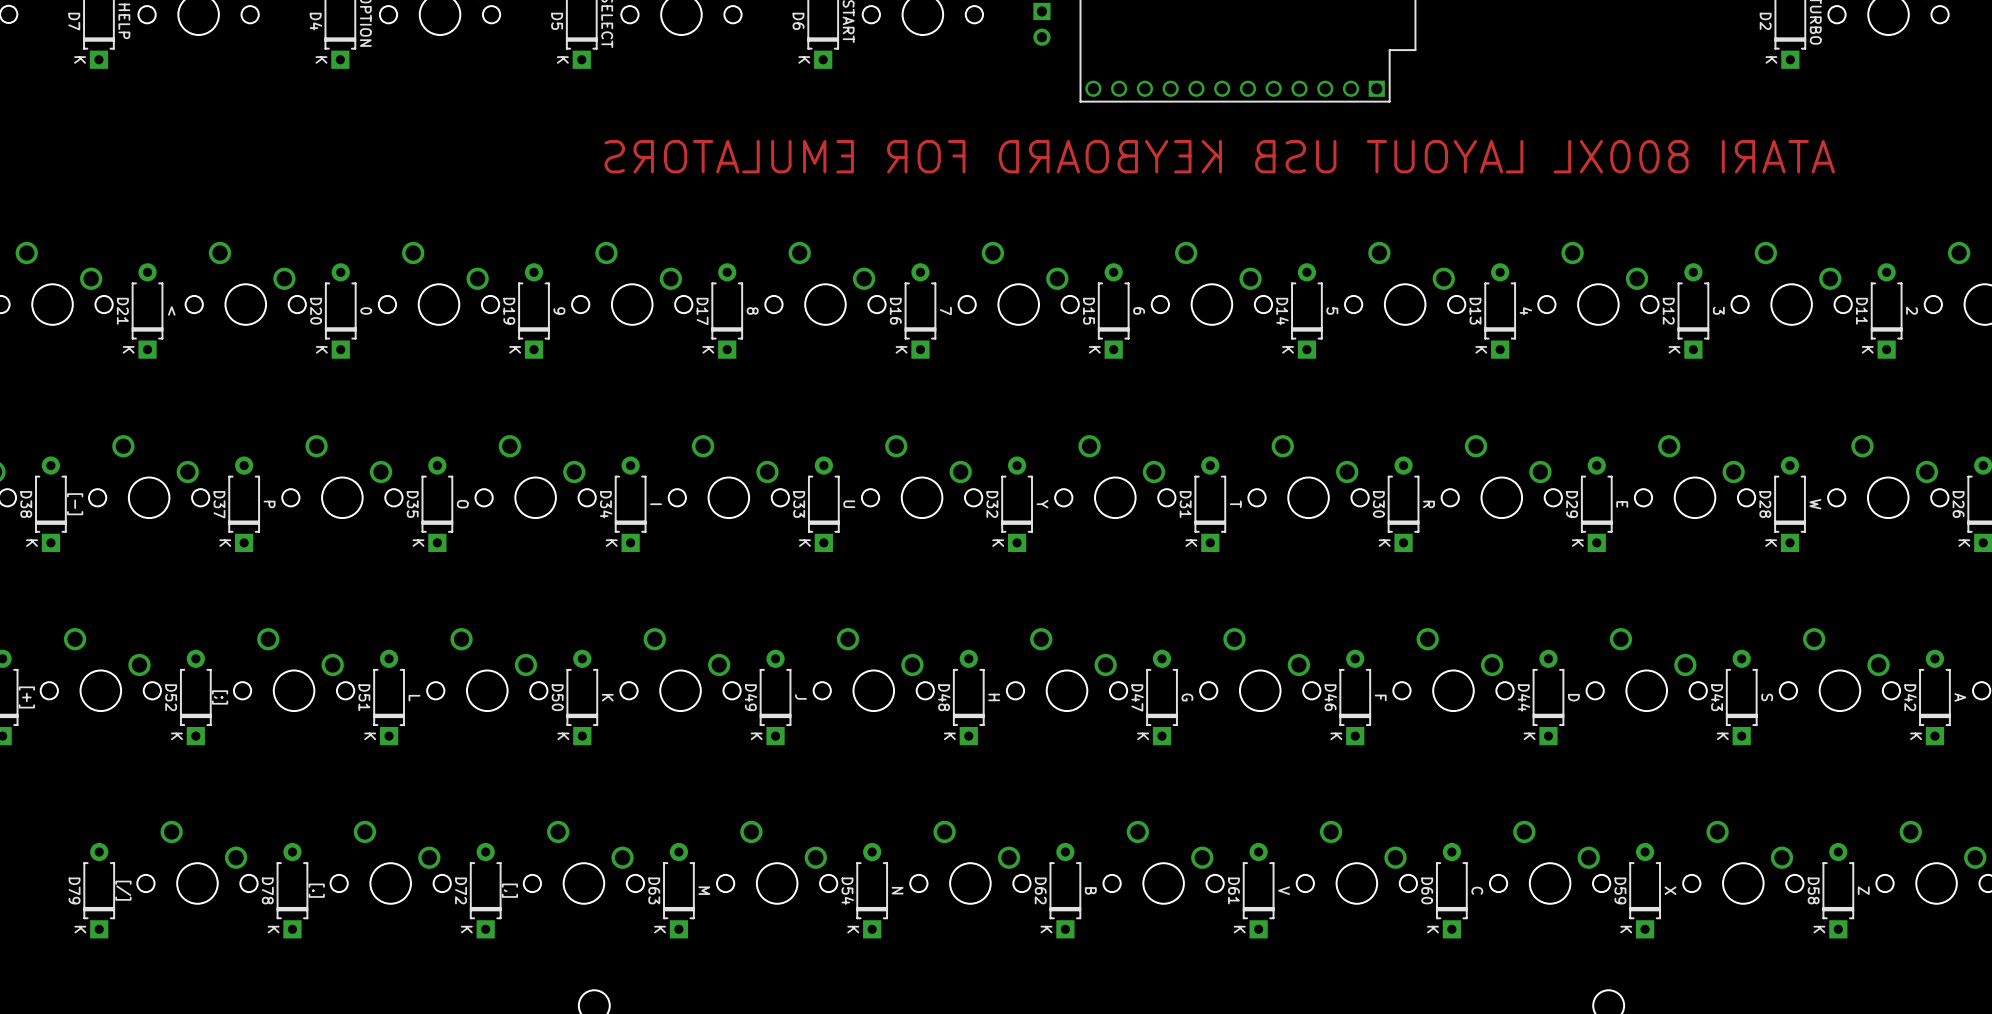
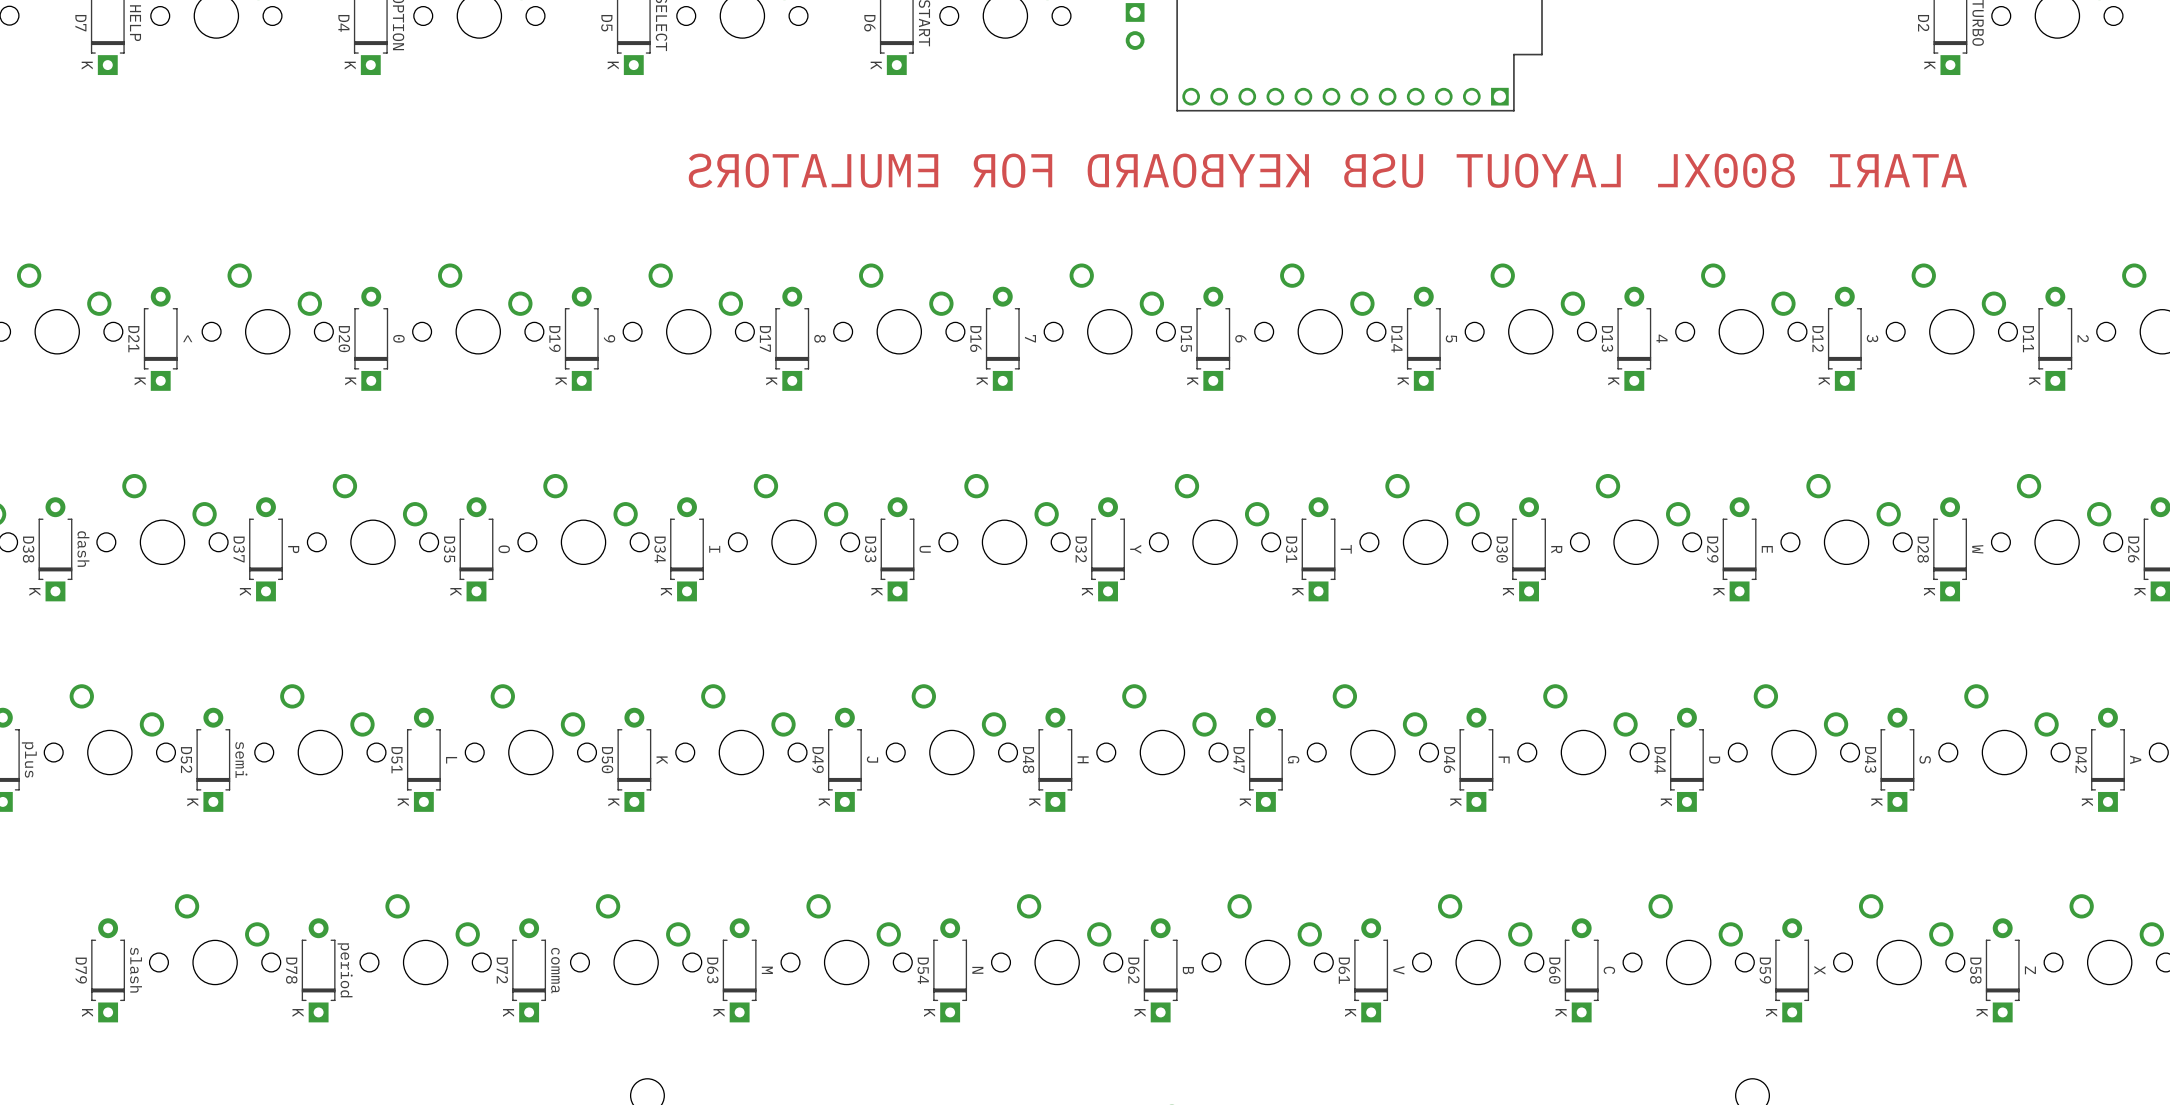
D38 value: [-] (75, 504) -> dash (83, 549)
part value: [+] (26, 697) -> plus (29, 759)
D52 value: [;] (220, 697) -> semi (241, 759)
D79 value: [/] (123, 890) -> slash (136, 970)
D78 value: [.] (316, 890) -> period (345, 970)
D72 value: [,] (509, 890) -> comma (555, 970)

